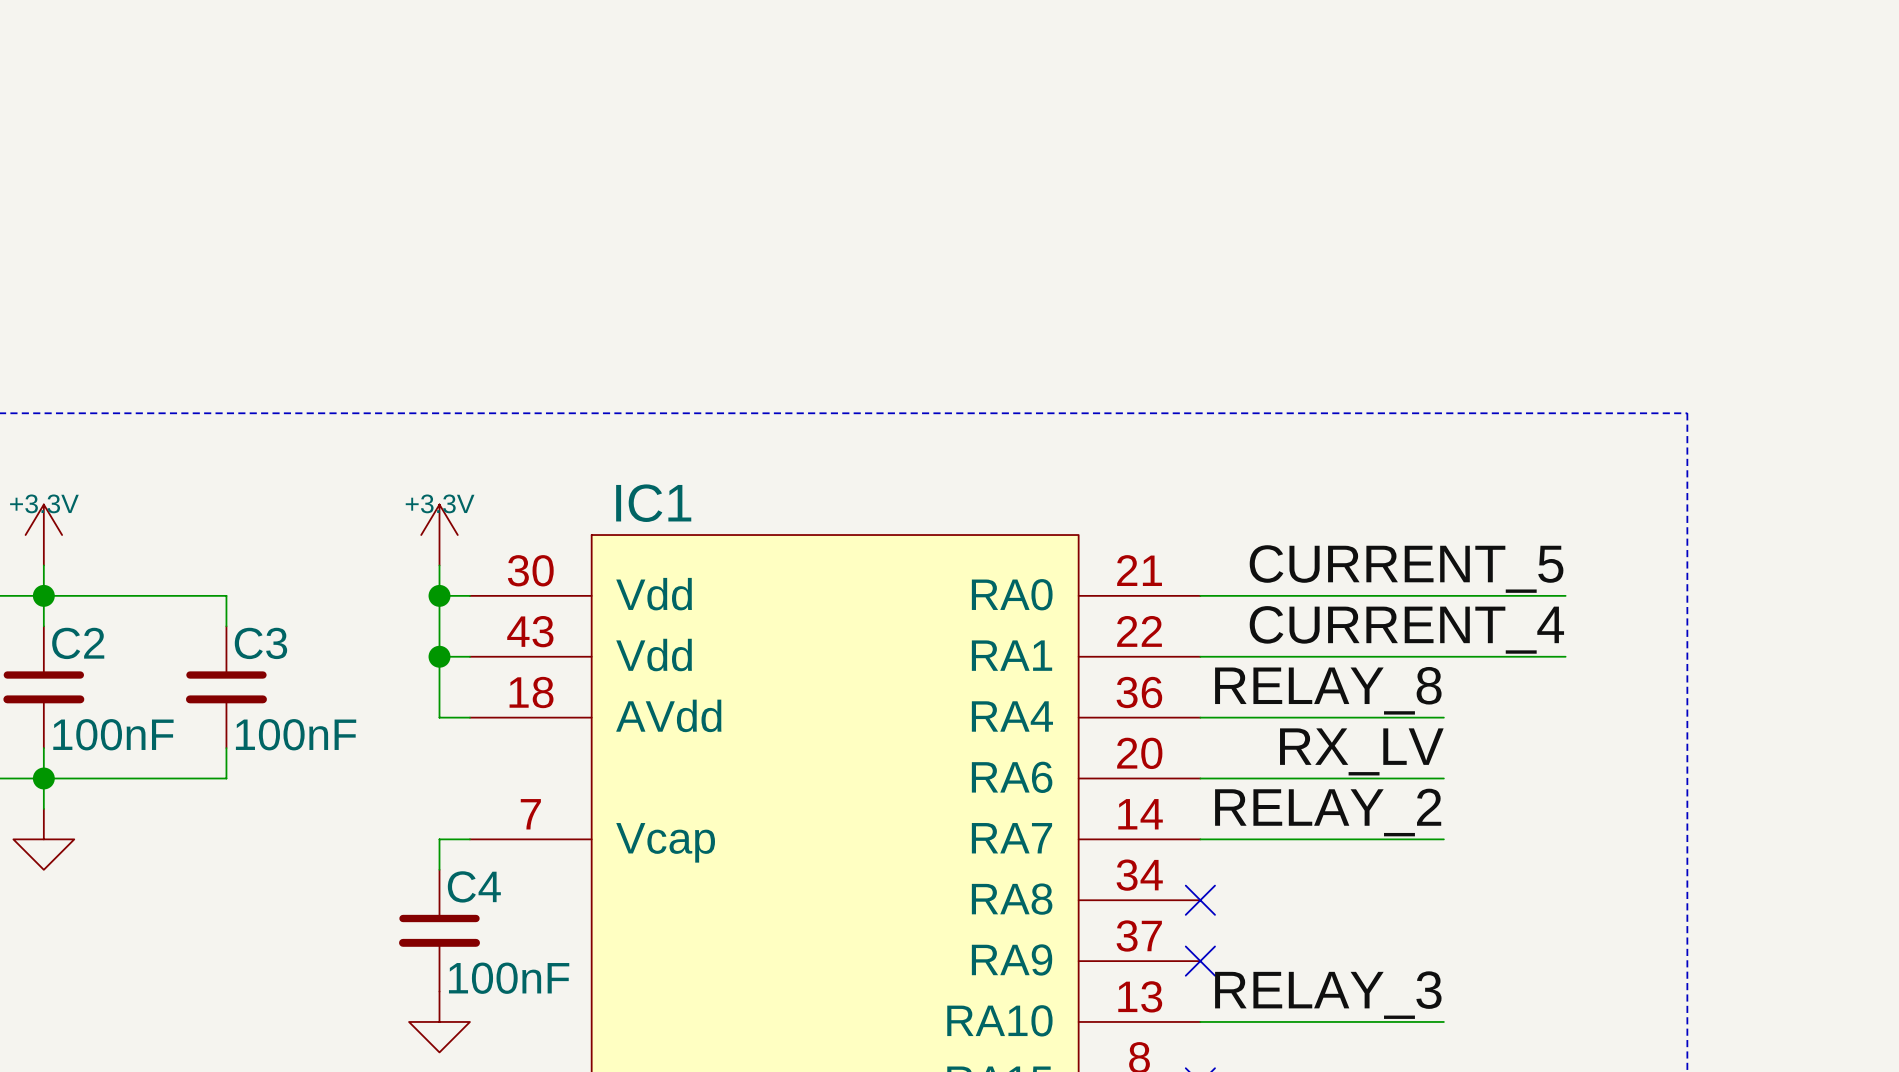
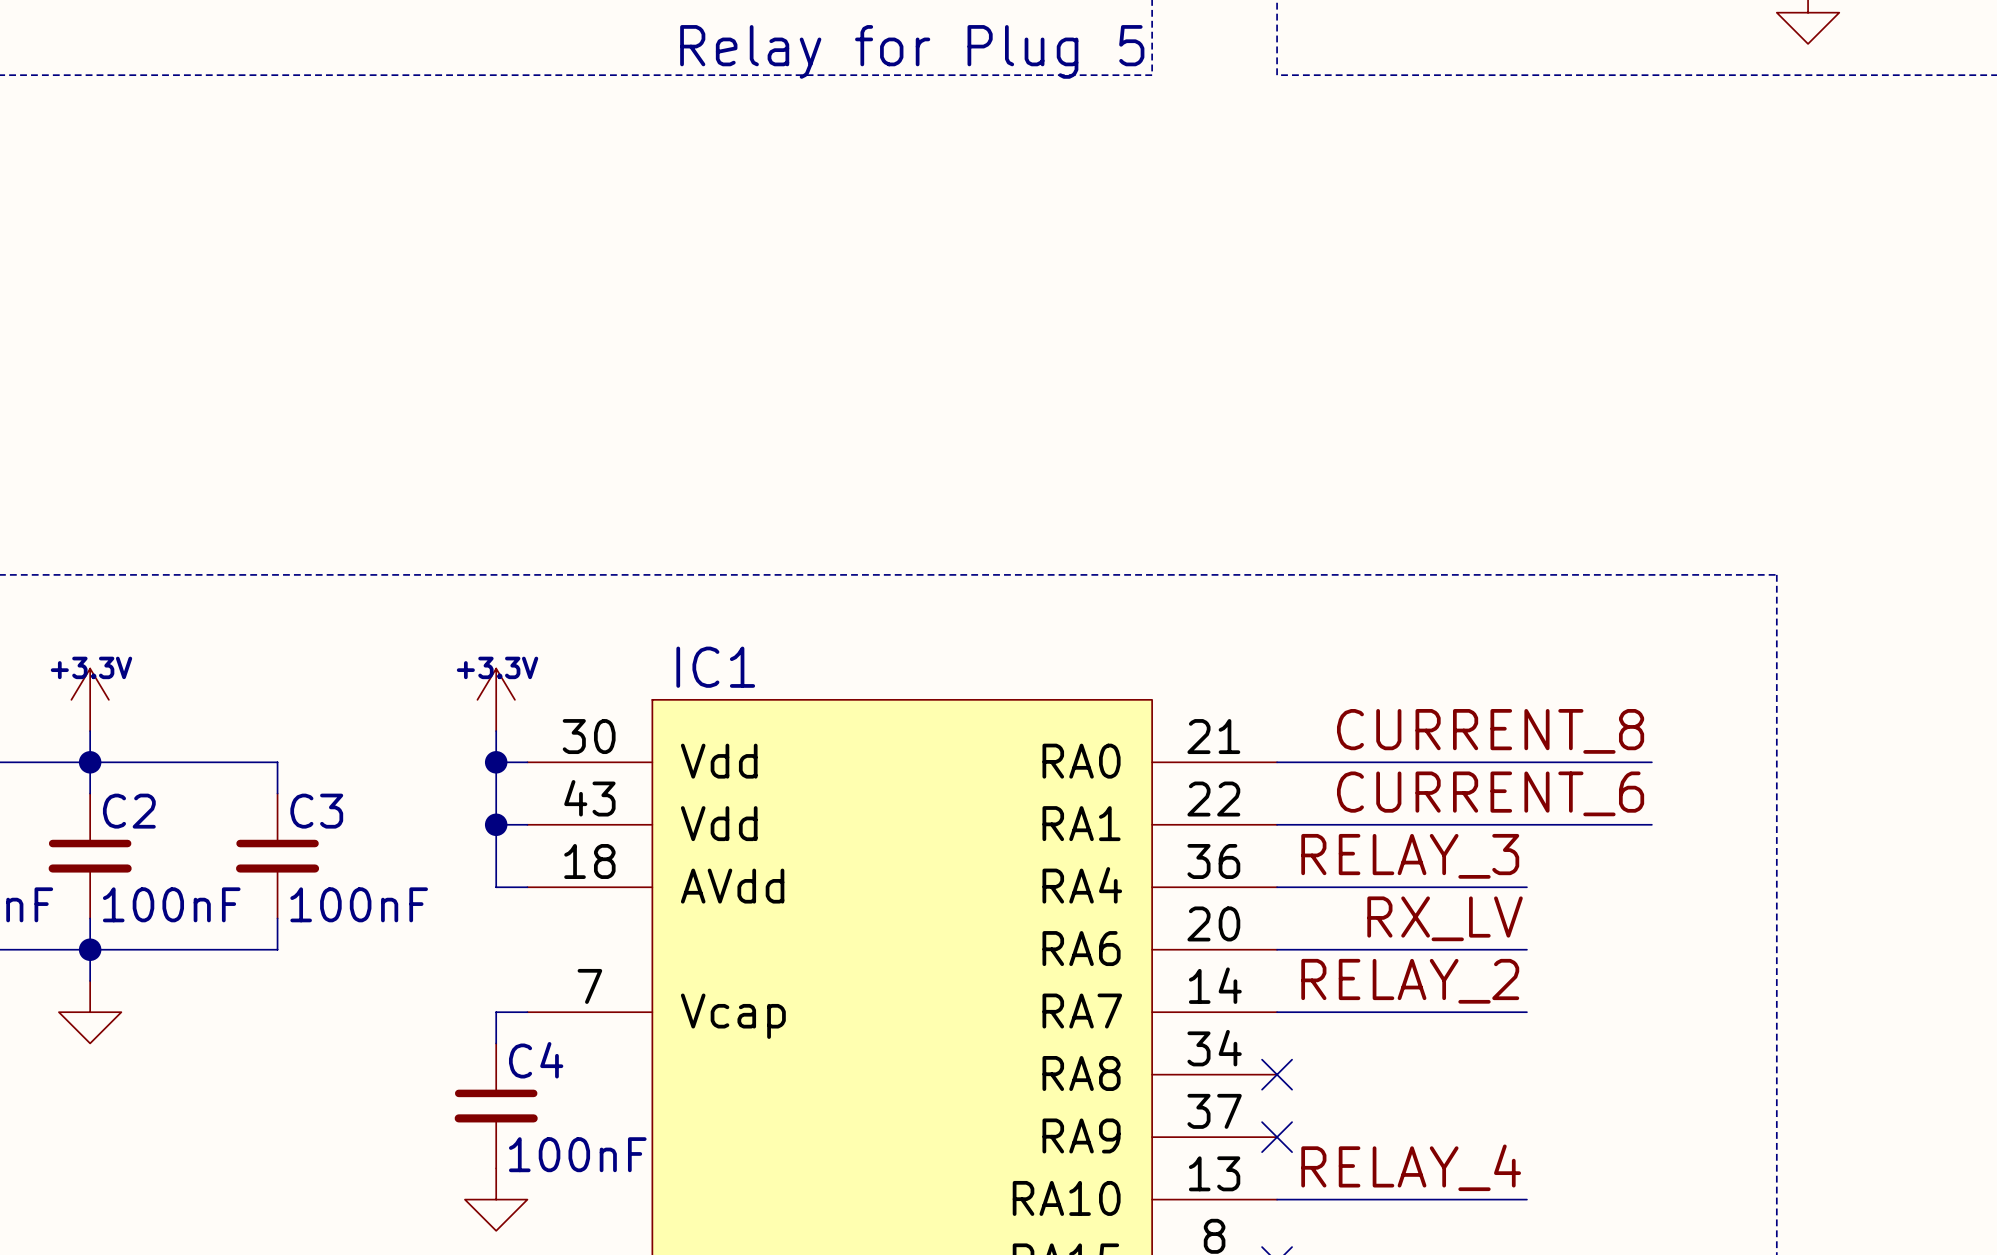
label: CURRENT_5 (1406, 569) -> CURRENT_8 (1490, 731)
label: CURRENT_4 (1406, 629) -> CURRENT_6 (1490, 793)
label: RELAY_8 (1328, 690) -> RELAY_3 (1410, 856)
label: RELAY_3 (1328, 995) -> RELAY_4 (1411, 1167)

